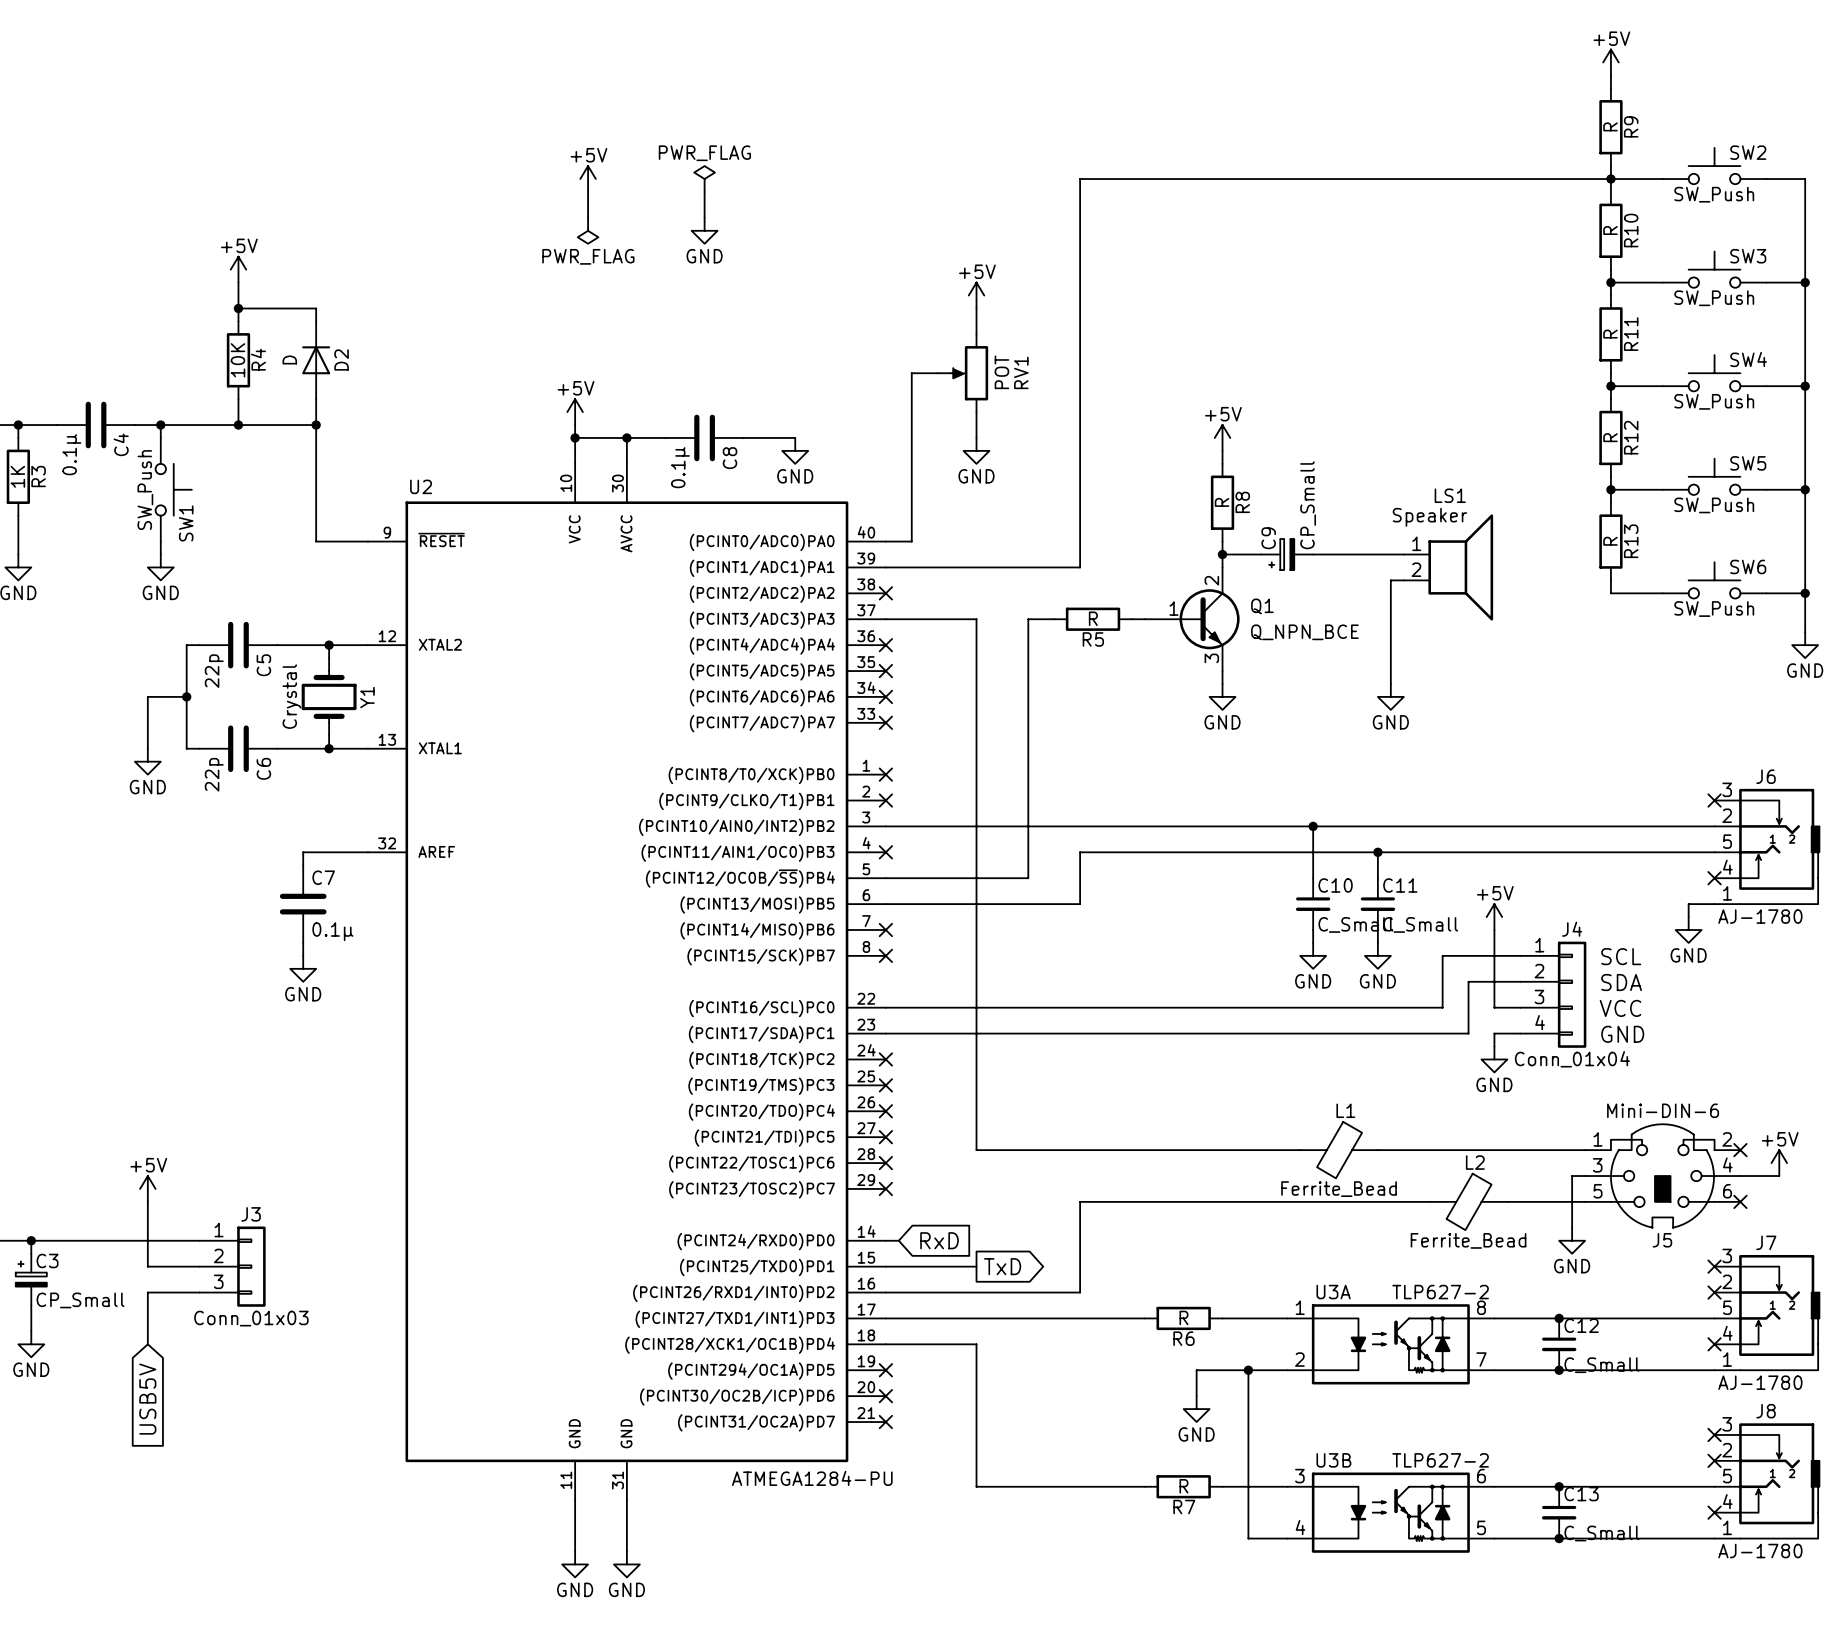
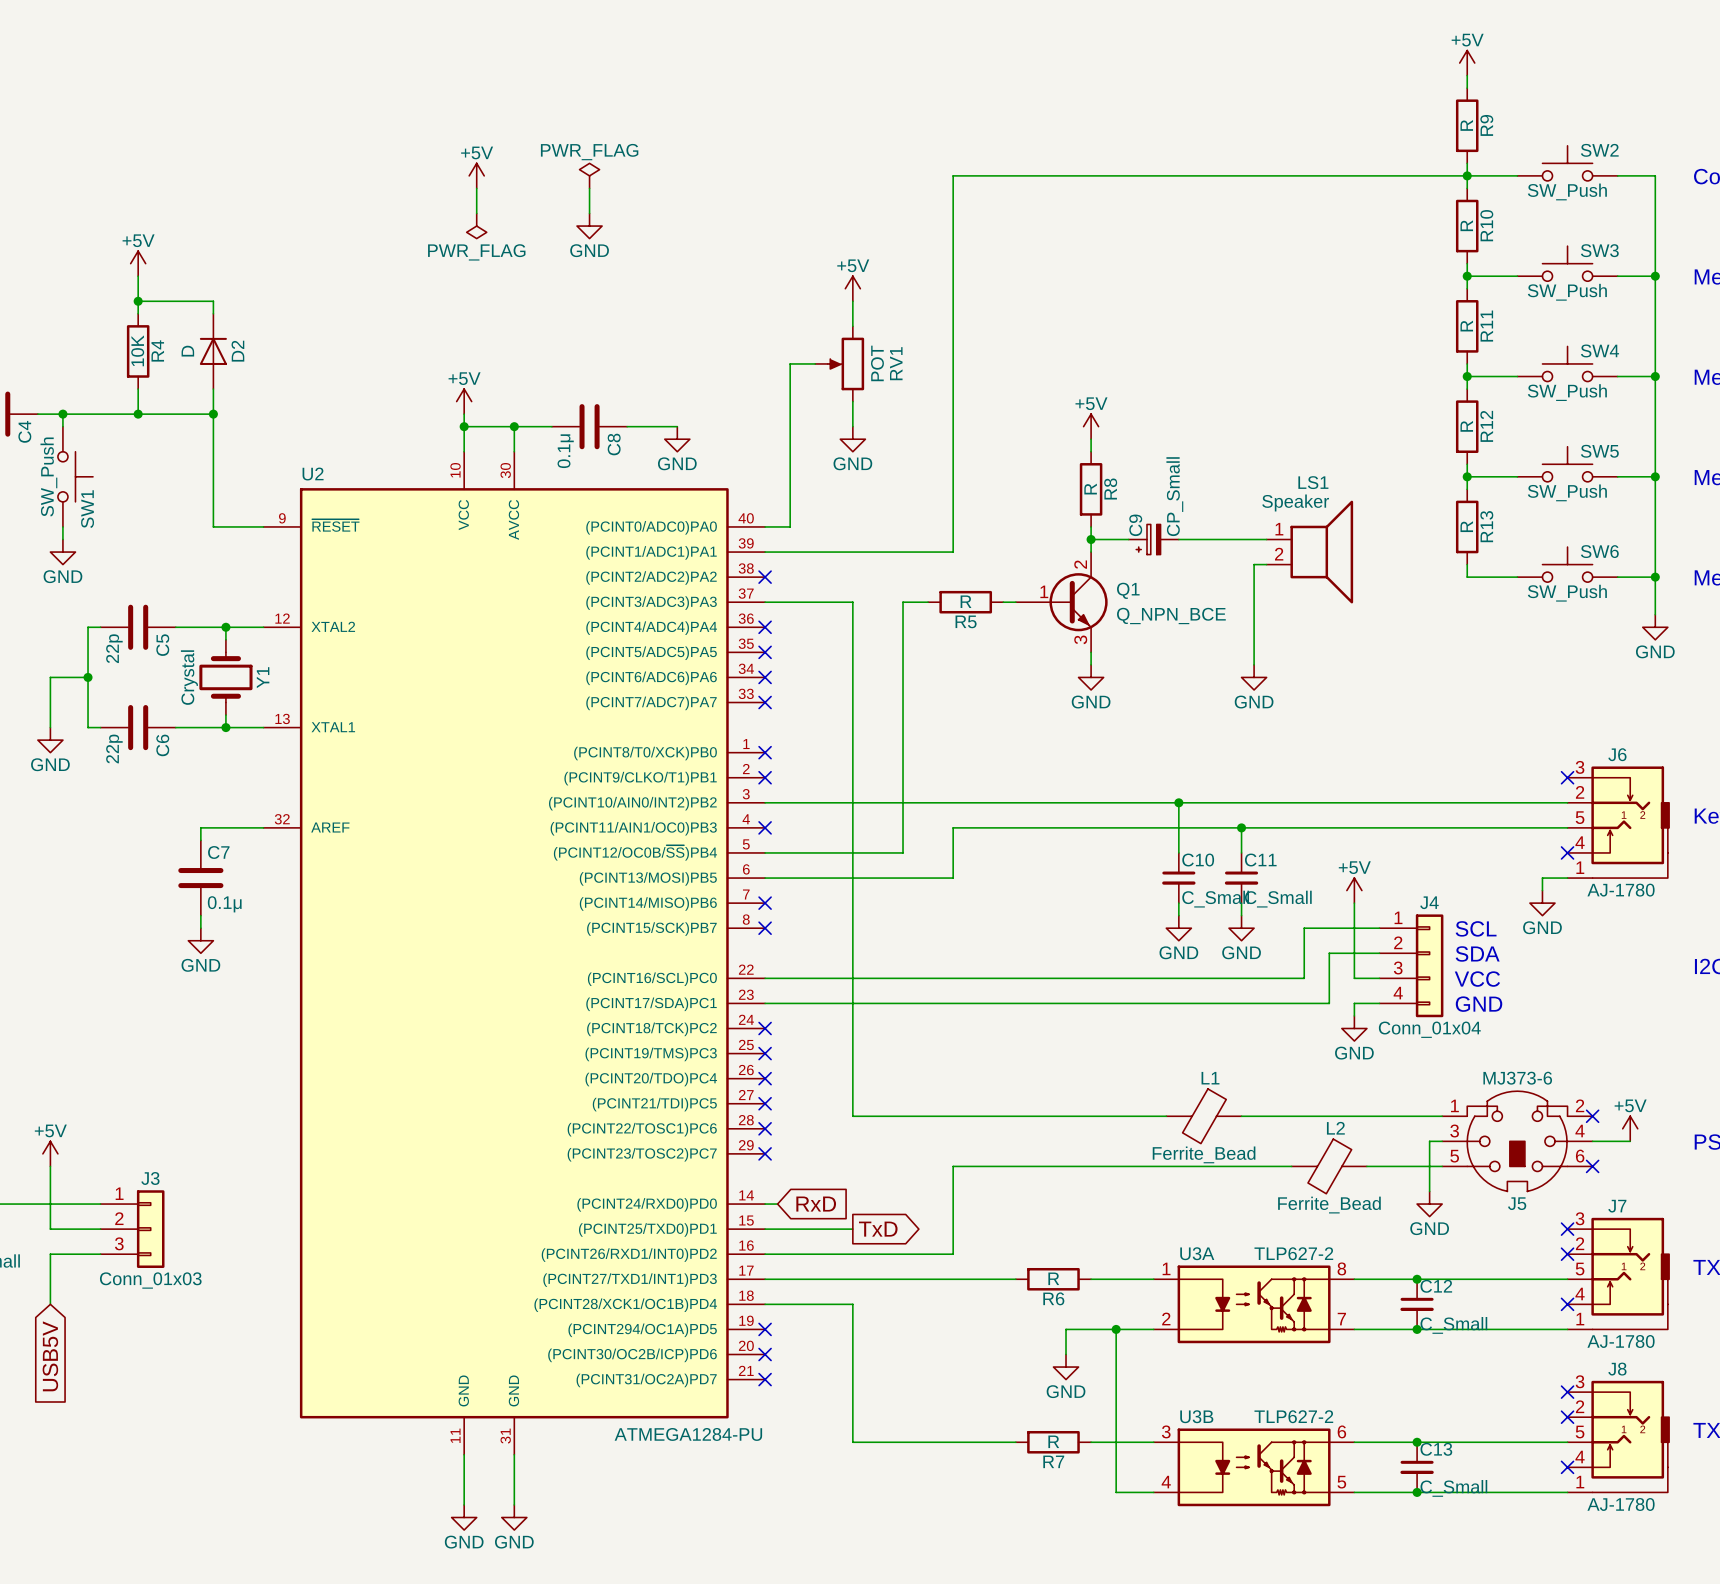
J5 value: Mini-DIN-6 (1663, 1110) -> MJ373-6 (1517, 1078)

